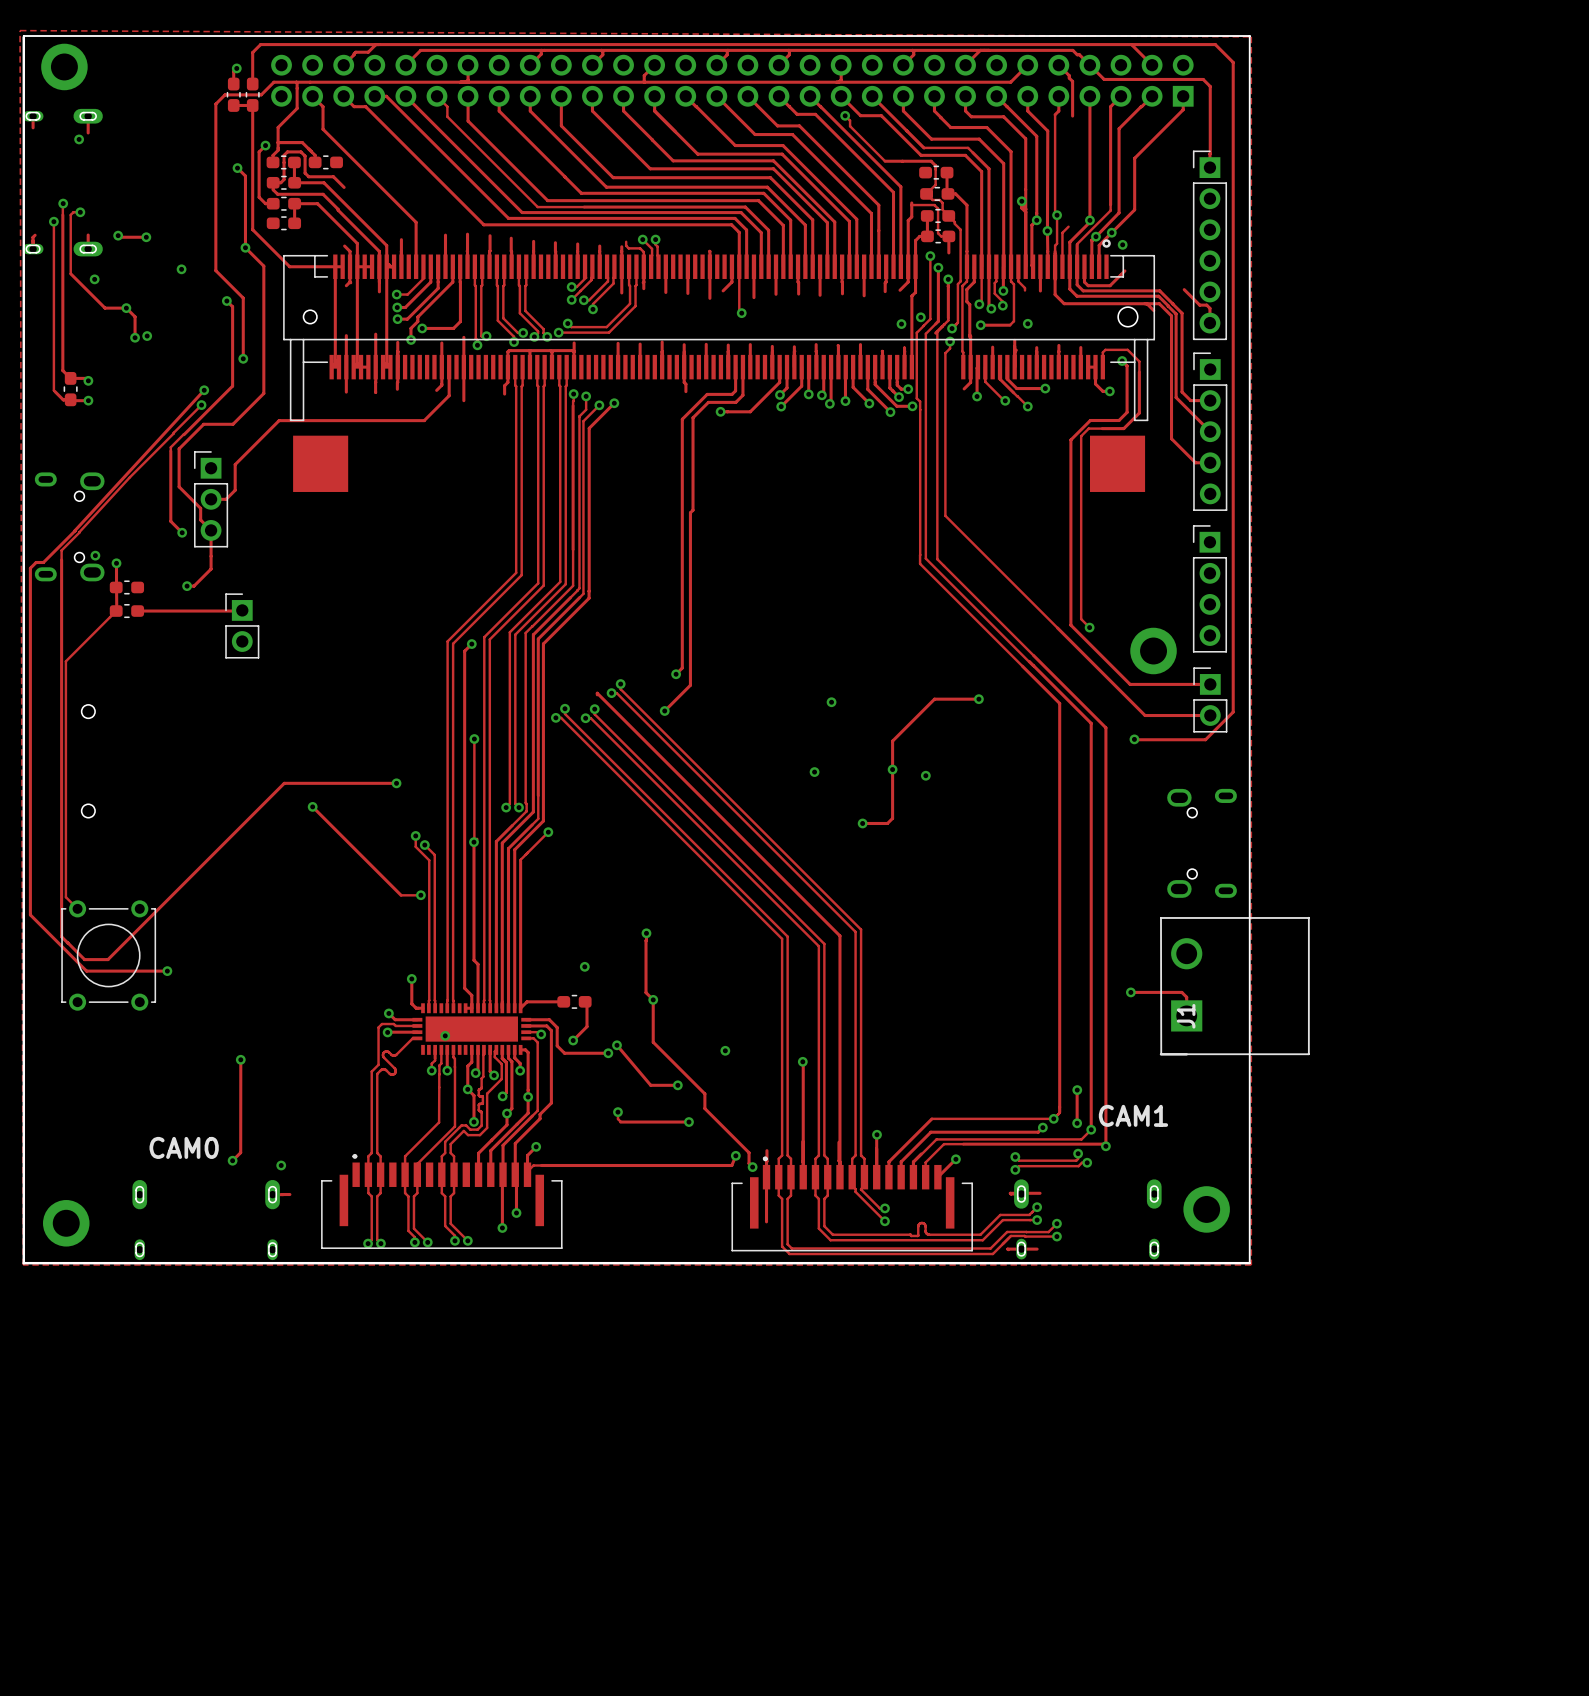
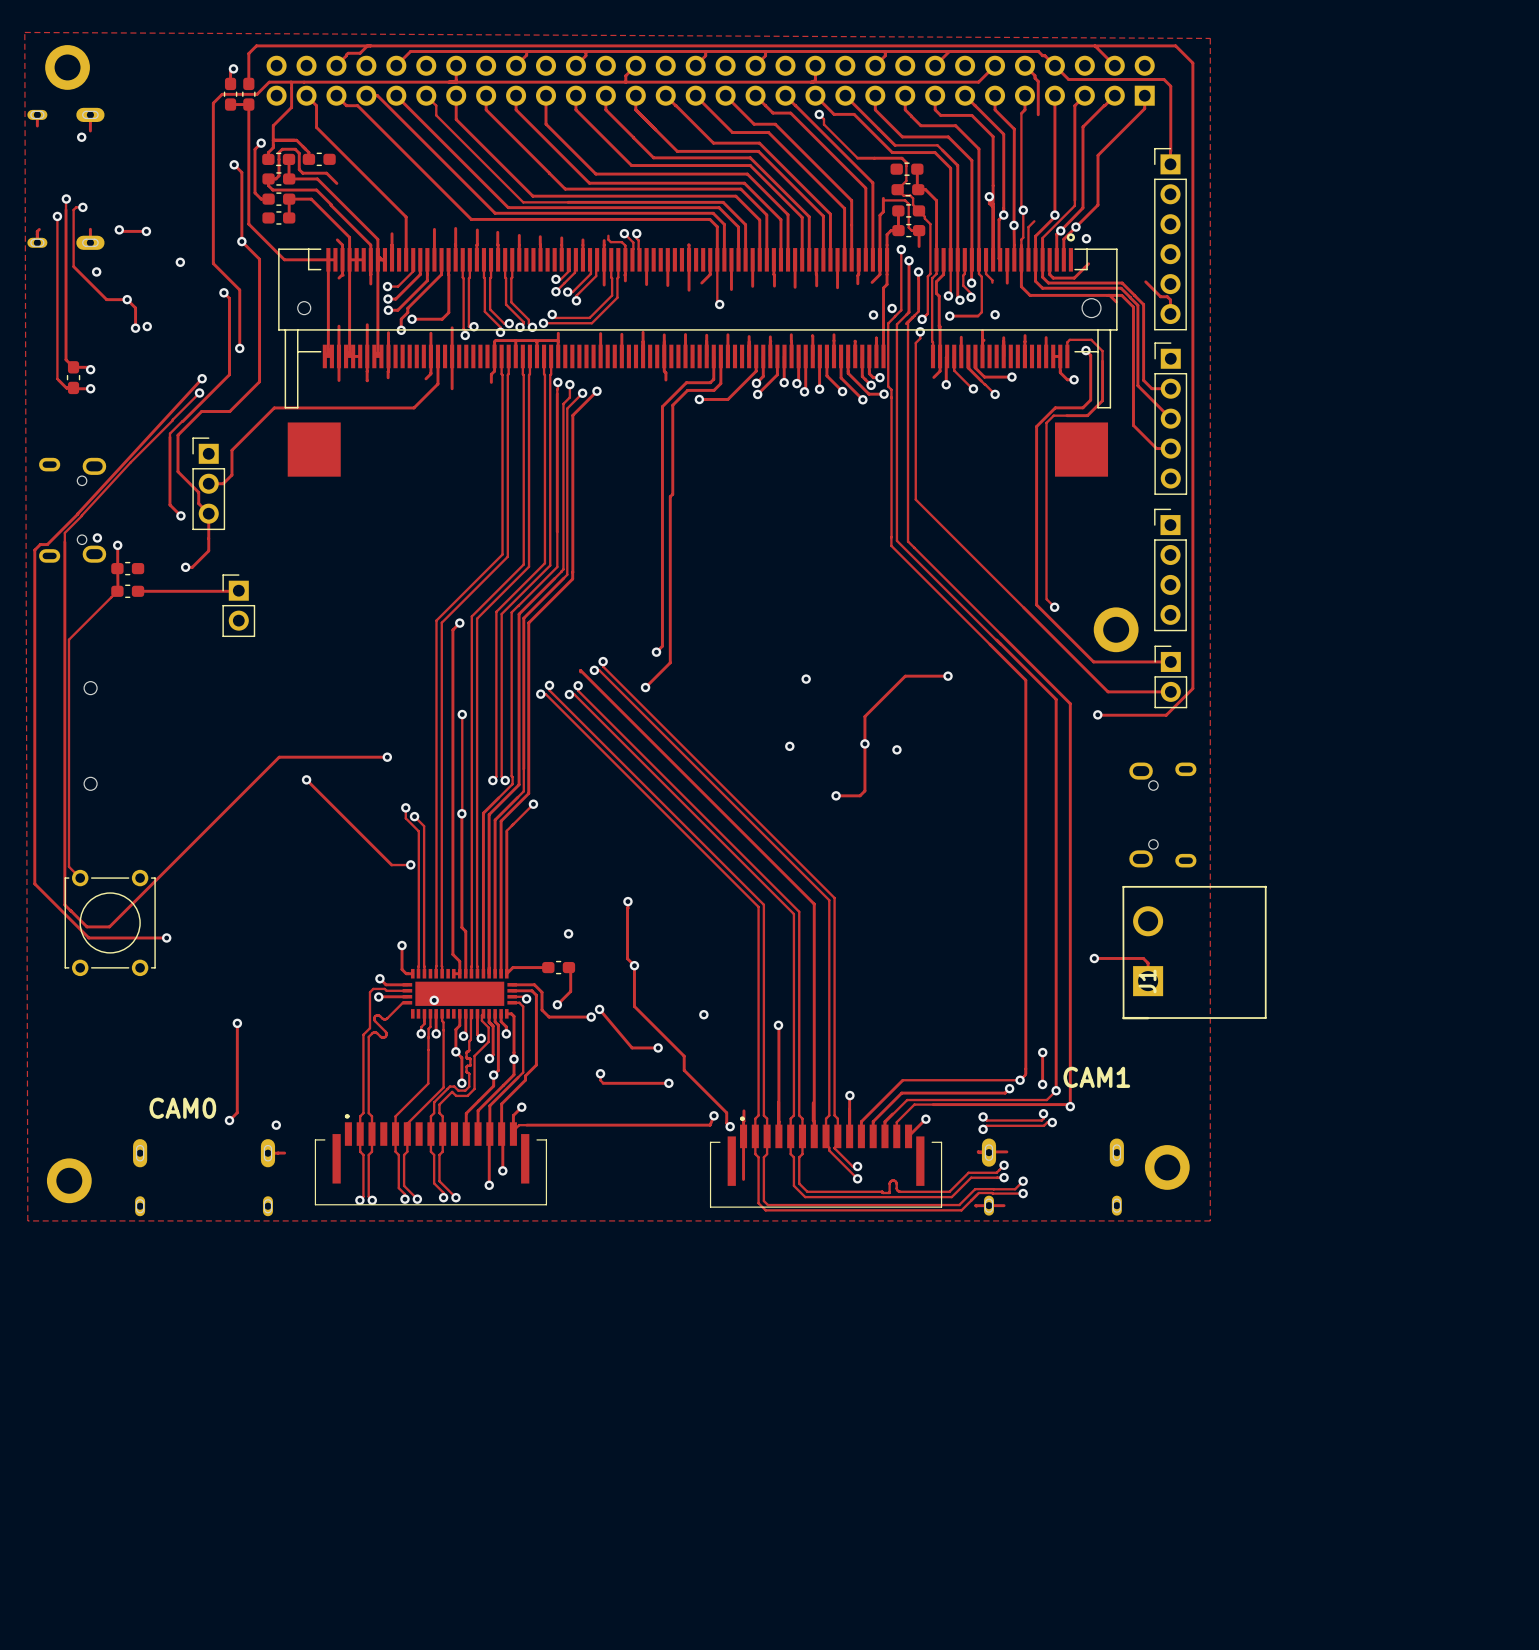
board edge: (23, 37) (23, 1263) (1249, 1263) (1249, 36) (23, 36) (23, 39) -> none

